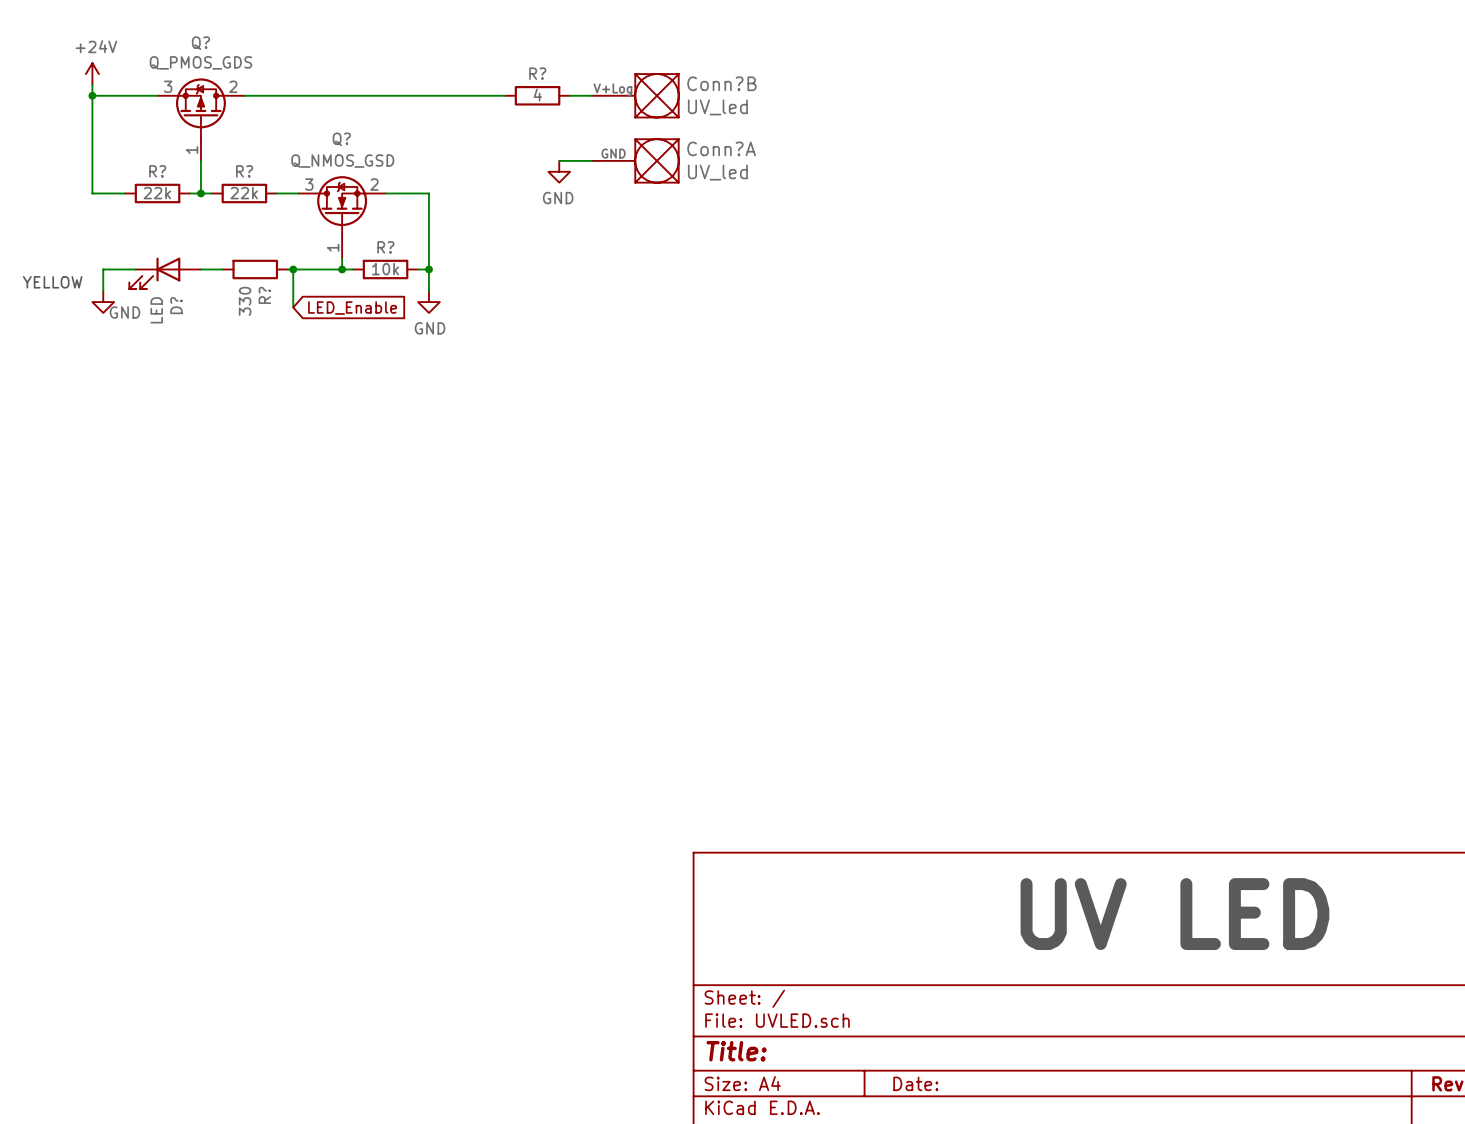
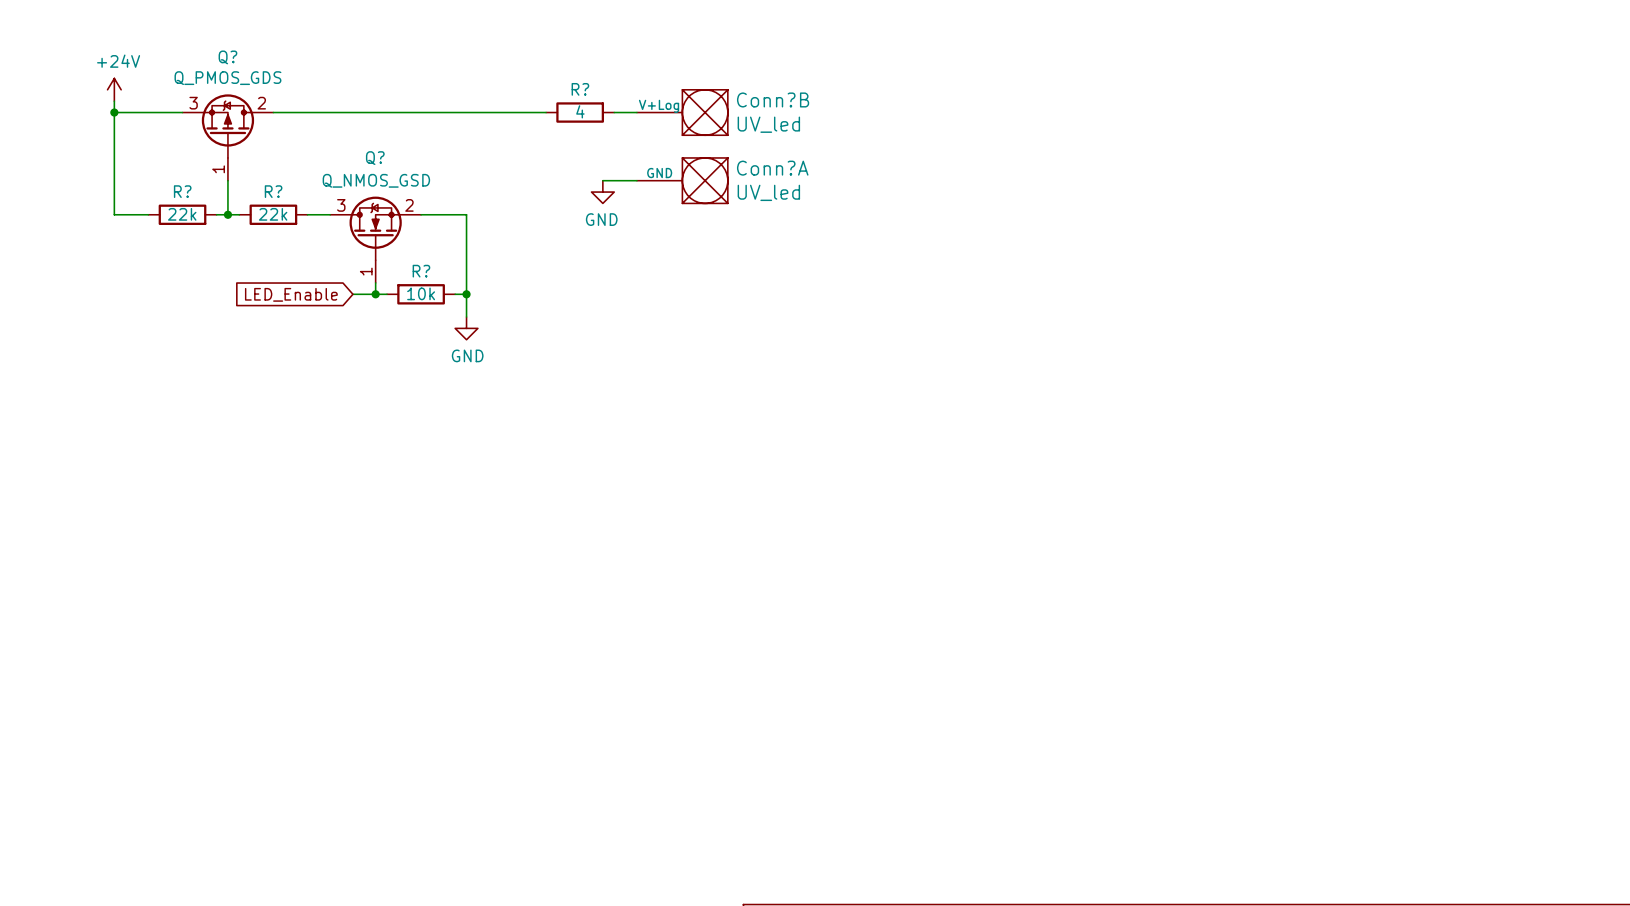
wire: (135, 269) (103, 269) (103, 291) -> none
wire: (200, 269) (222, 269) -> none
R?: 330 (255, 269) -> none
wire: (287, 269) (320, 269) -> none
wire: (293, 269) (293, 307) -> none
junction: (293, 269) -> none
D?: LED (165, 273) -> none
text: YELLOW (52, 282) -> none
power symbol: GND (103, 302) -> none
global label rotation: 0° (352, 308) -> 180° (291, 294)

